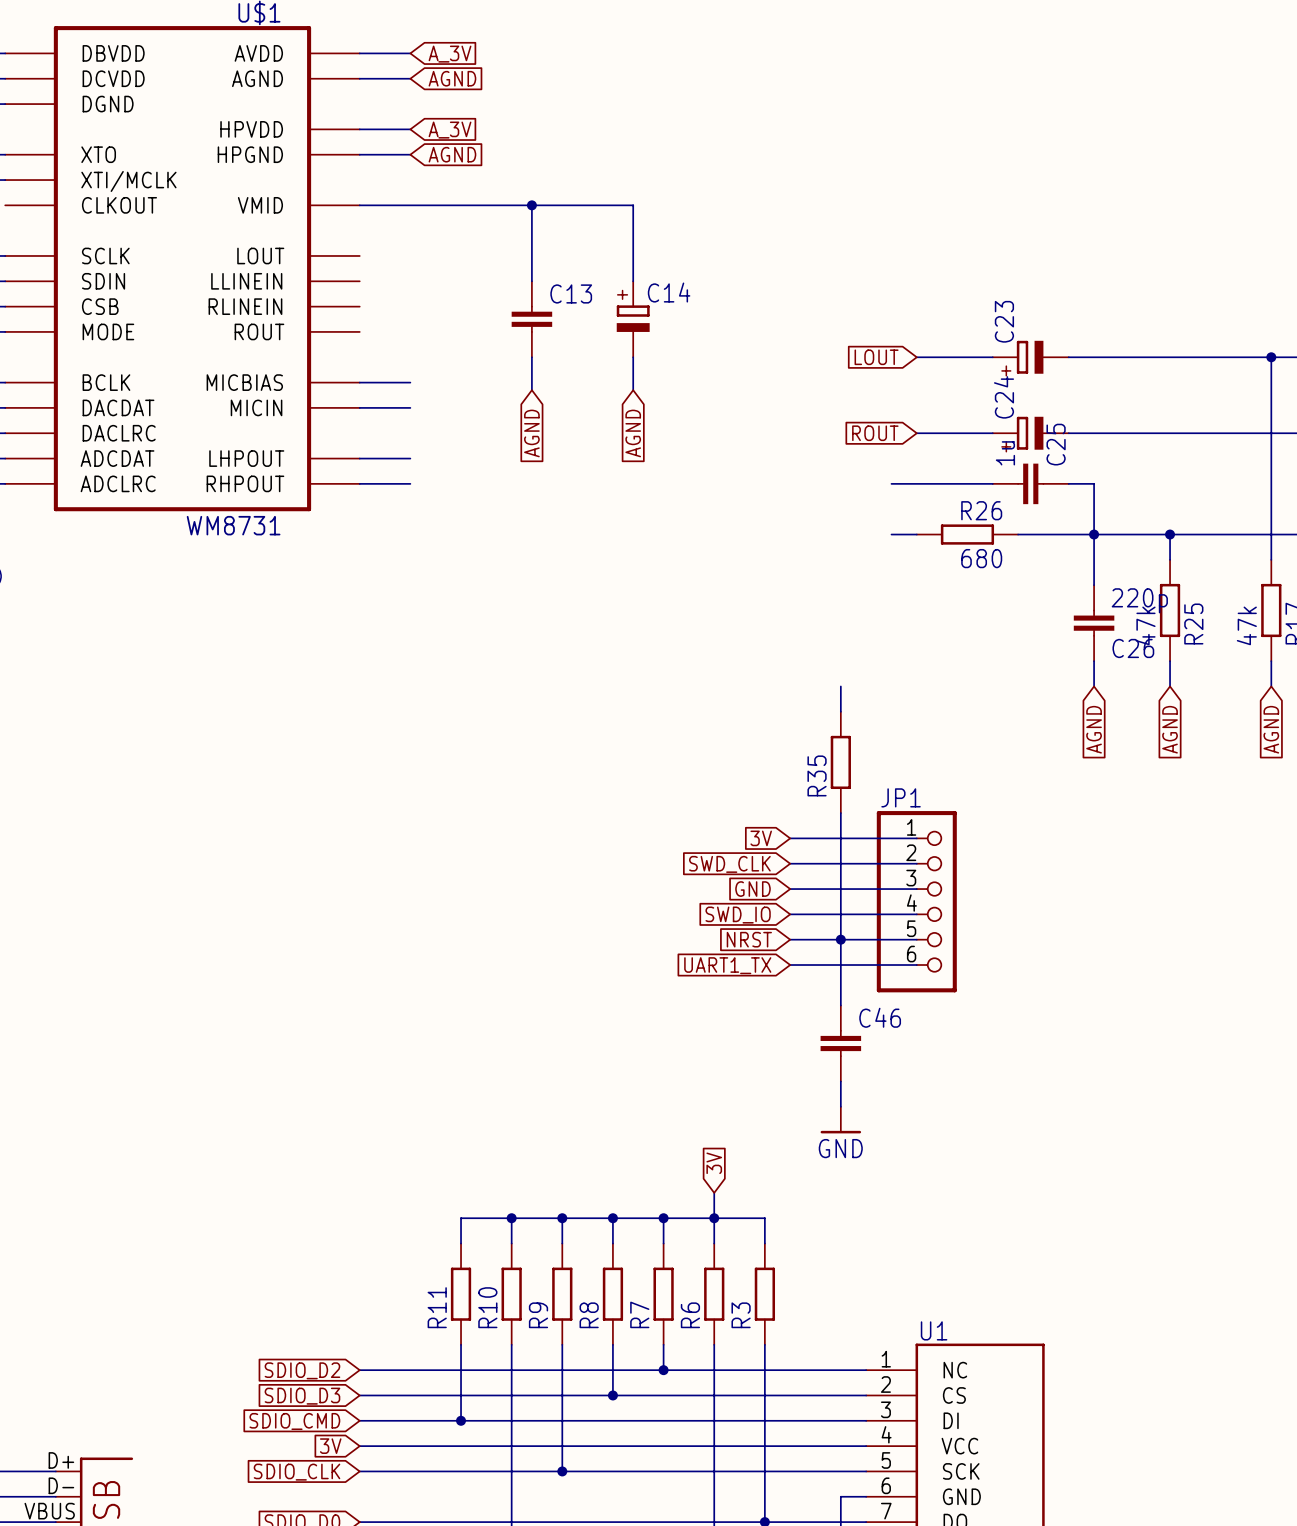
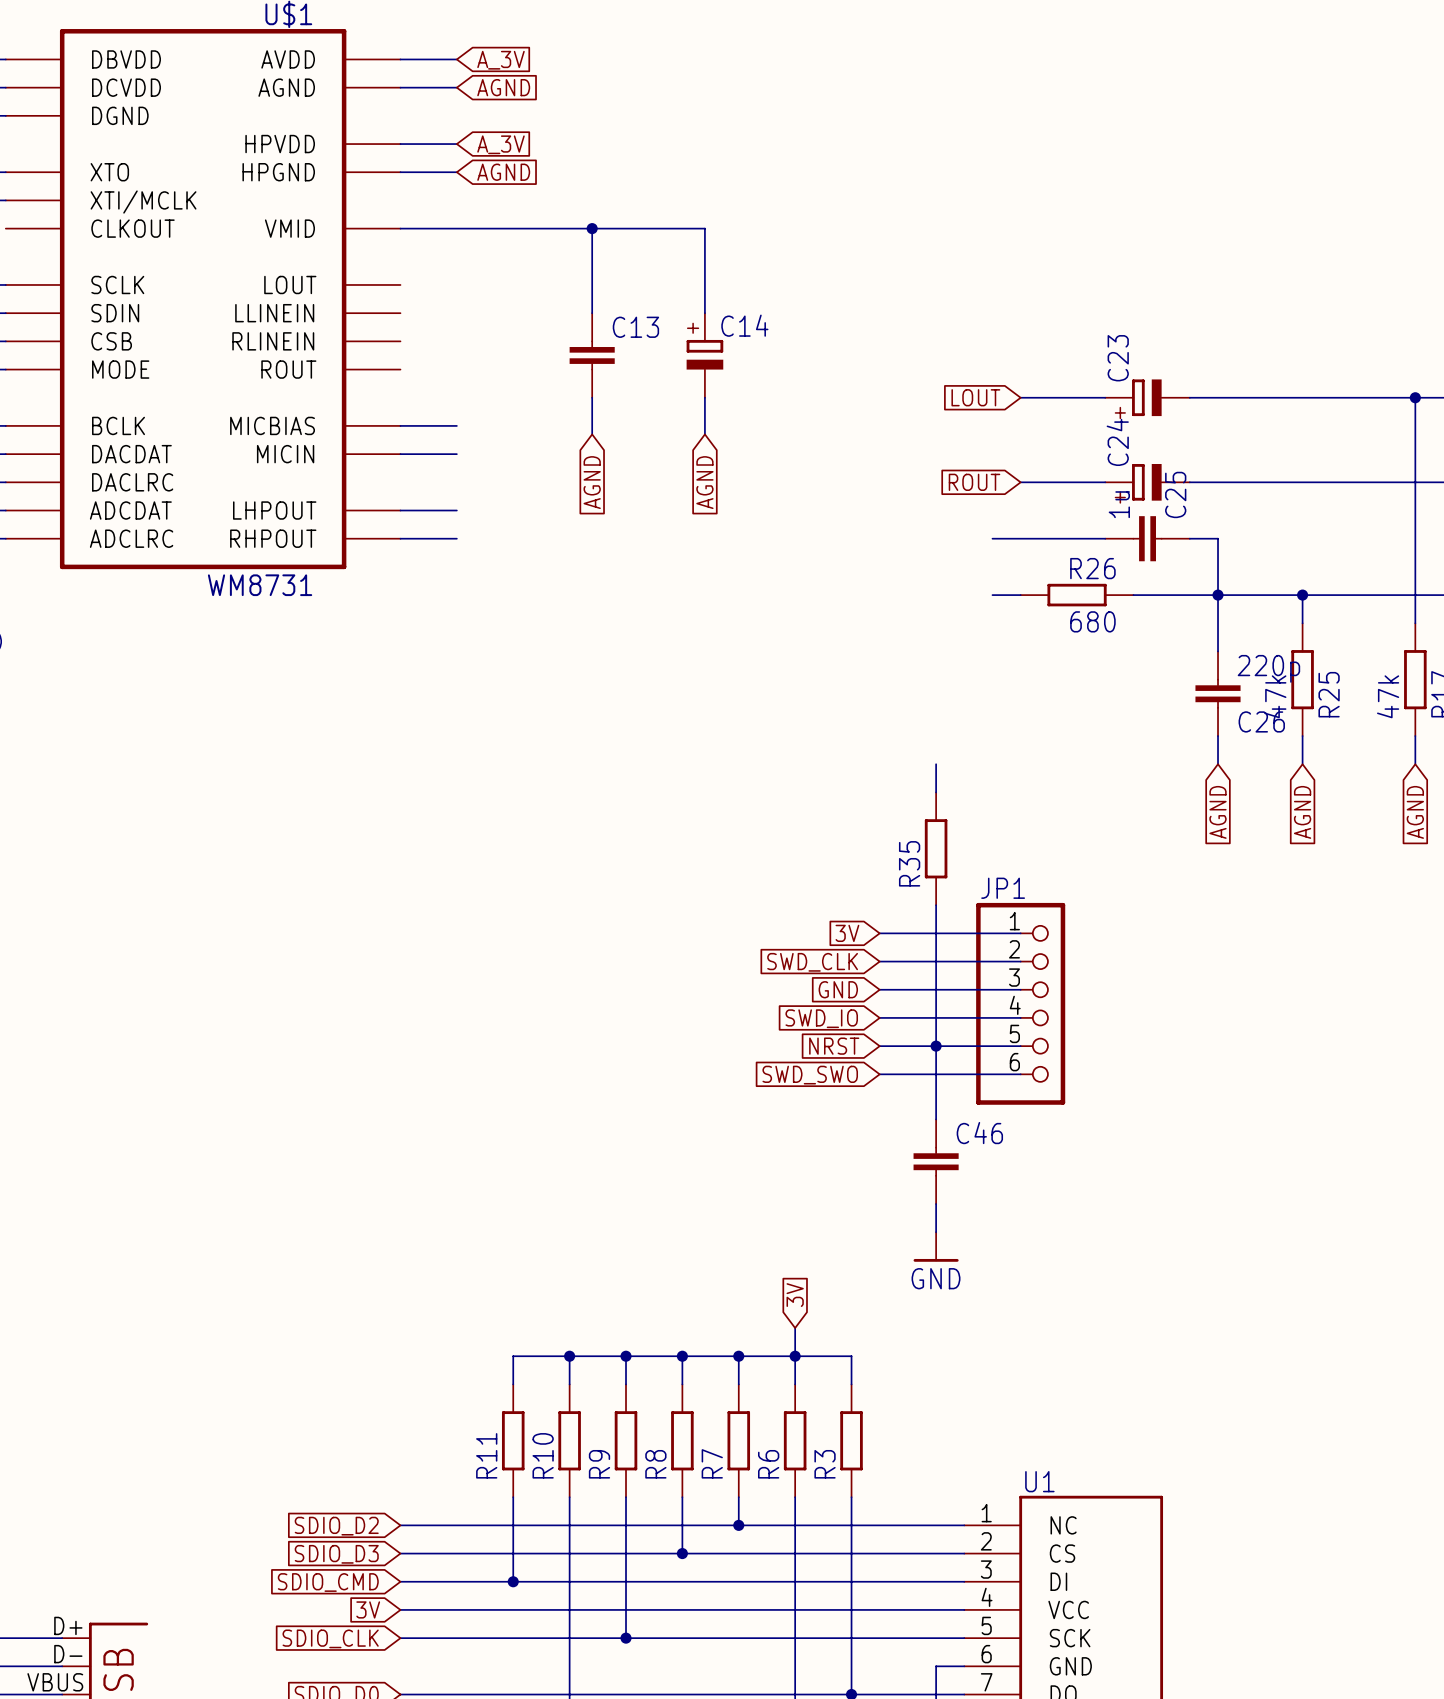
global label: UART1_TX (727, 965) -> SWD_SWO (810, 1075)

